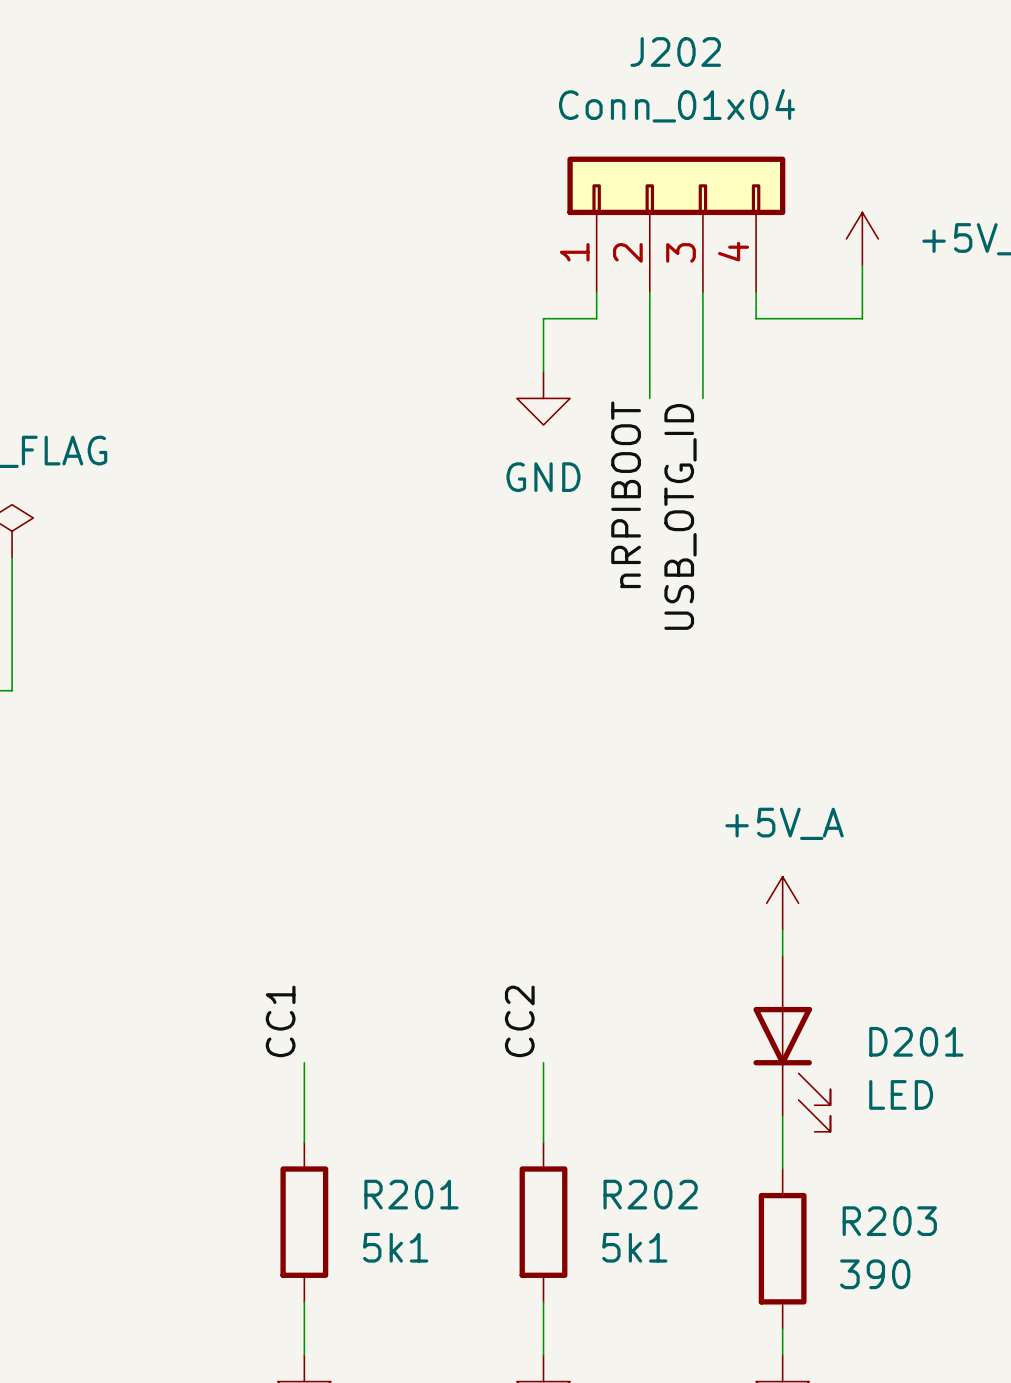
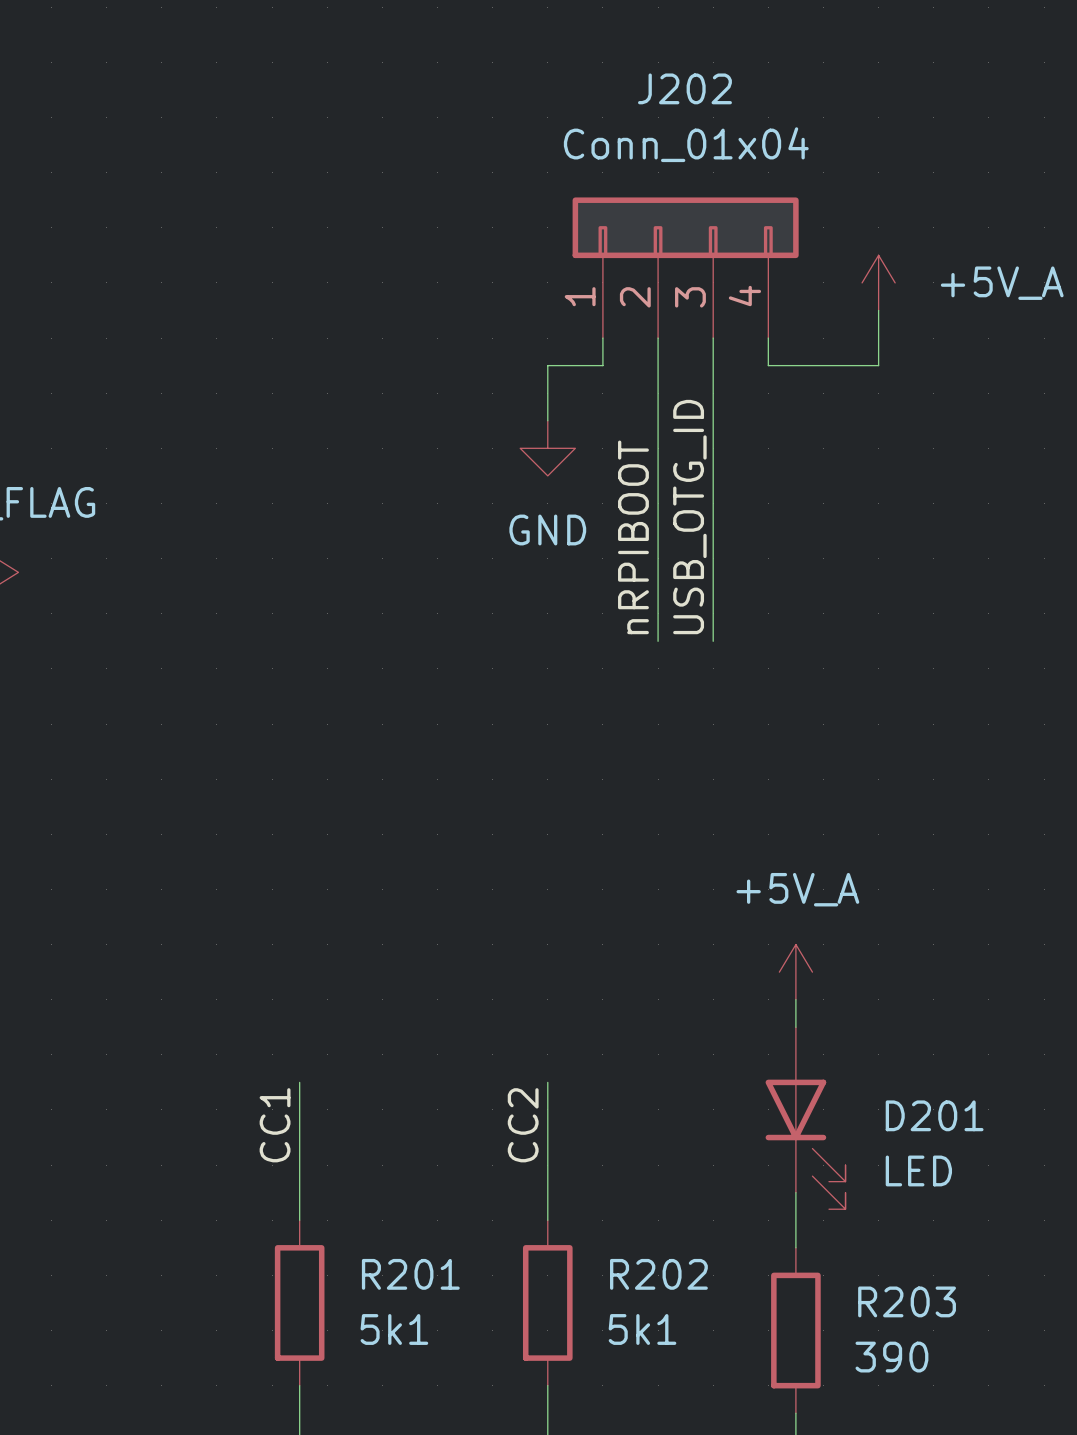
wire: none -> (658, 448) (658, 641)
wire: none -> (713, 448) (713, 641)
label position: nRPIBOOT (626, 494) -> nRPIBOOT (633, 537)
label position: USB_OTG_ID (680, 516) -> USB_OTG_ID (689, 517)
wire: none -> (299, 1082) (299, 1137)
wire: none -> (547, 1082) (547, 1137)
label position: CC1 (280, 1021) -> CC1 (275, 1125)
label position: CC2 (519, 1021) -> CC2 (523, 1125)

